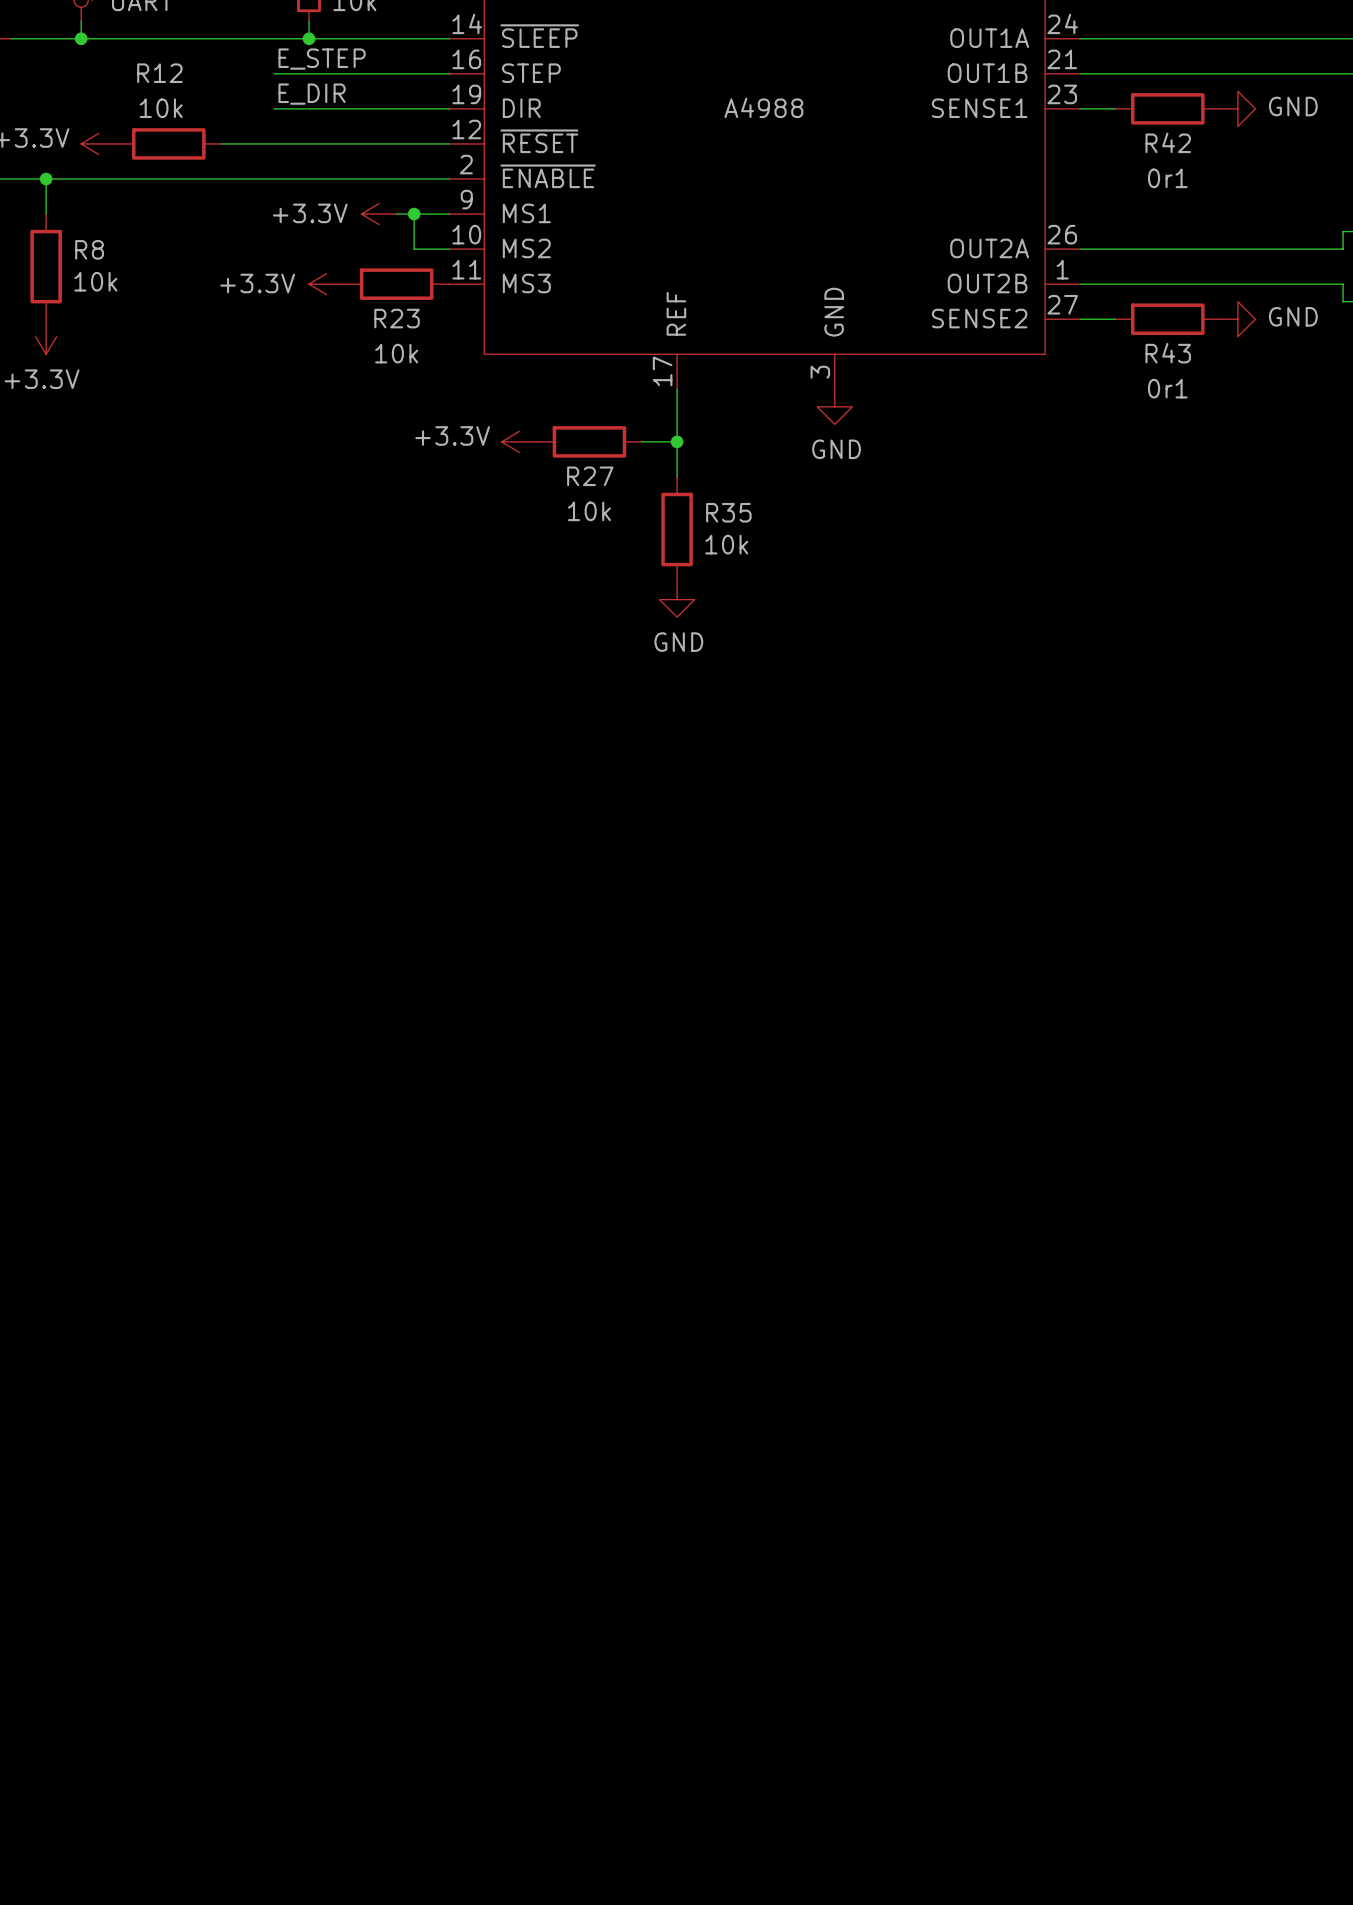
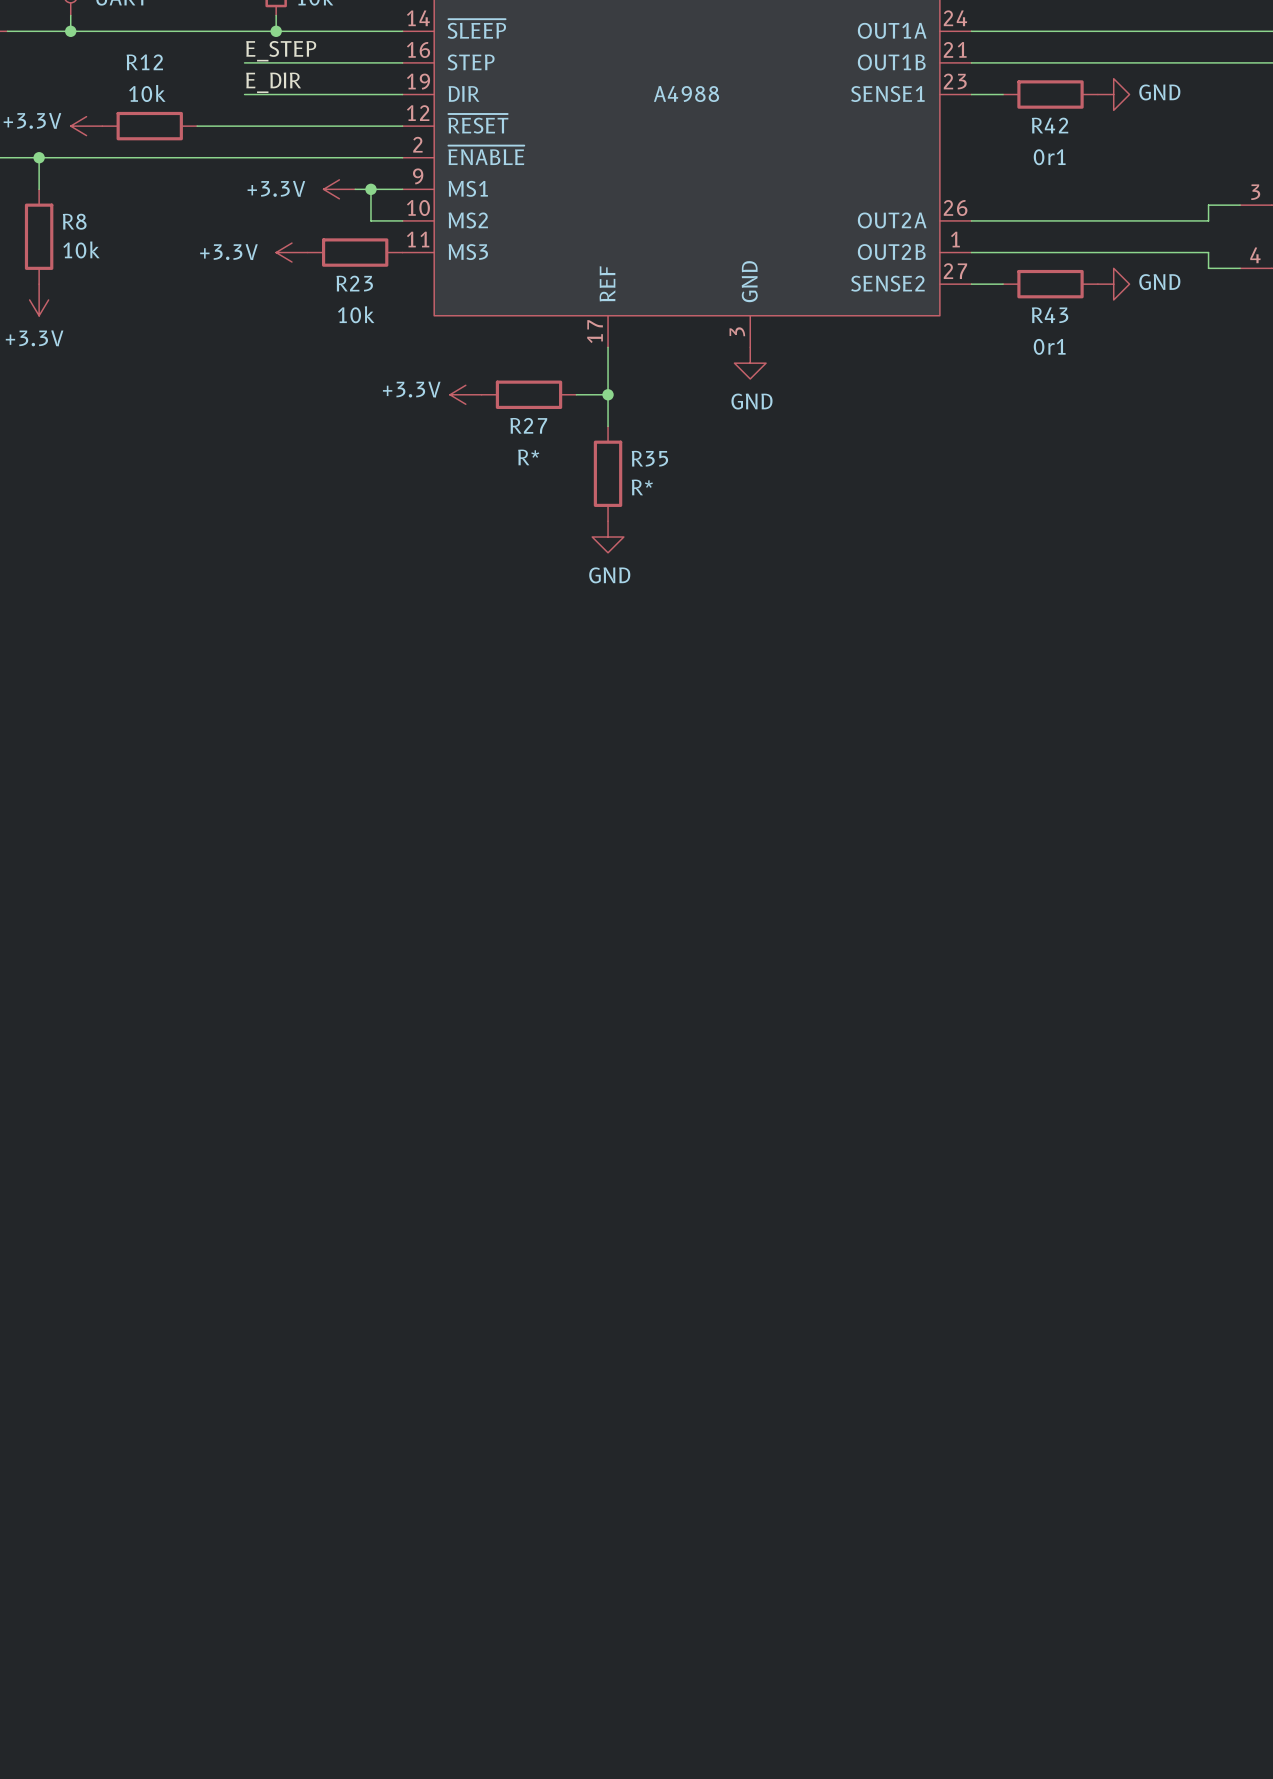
R27 value: 10k (589, 511) -> R* (528, 457)
R35 value: 10k (726, 544) -> R* (642, 487)

